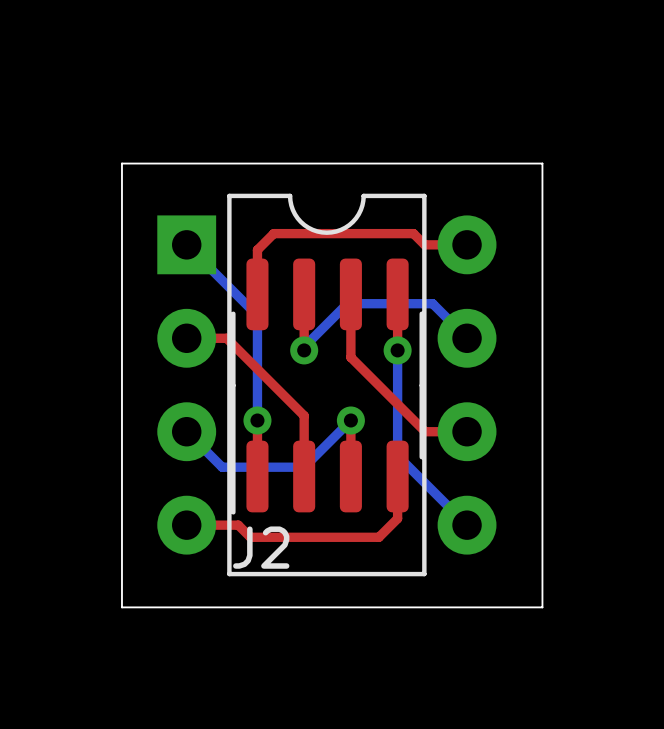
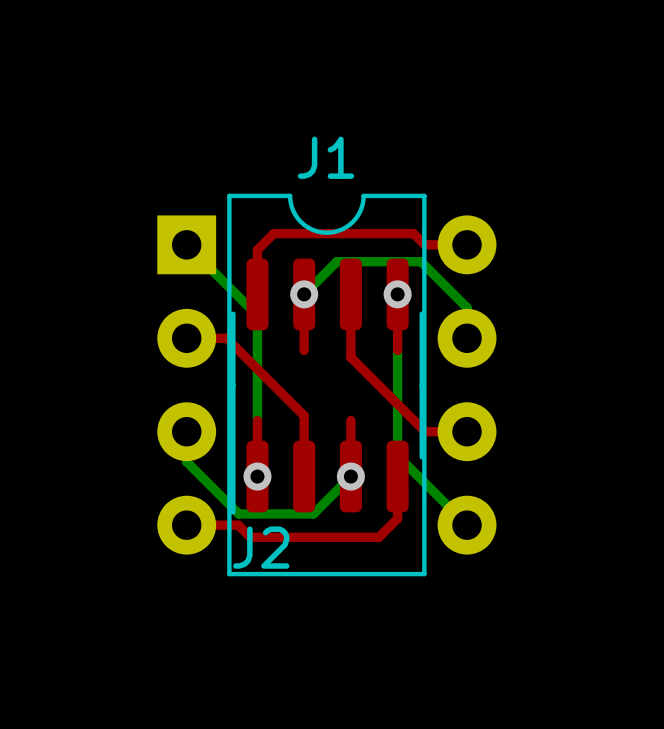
J1 name: none -> J1 (326, 157)
board edge: (121, 163) (542, 163) (542, 607) (121, 607) (121, 163) -> none
via: none -> (304, 294)
via: none -> (397, 294)
bottom track: (467, 338) (432, 303) (347, 303) (304, 346) (304, 350) -> (467, 338) (467, 307) (420, 261) (336, 261) (304, 294)
via: (304, 350) -> none
via: (397, 350) -> none
via: (257, 420) -> none
bottom track: (350, 420) (304, 467) (222, 467) (186, 431) -> (350, 476) (313, 513) (238, 513) (186, 461) (186, 431)
via: (350, 420) -> none
via: none -> (257, 476)
via: none -> (350, 476)

